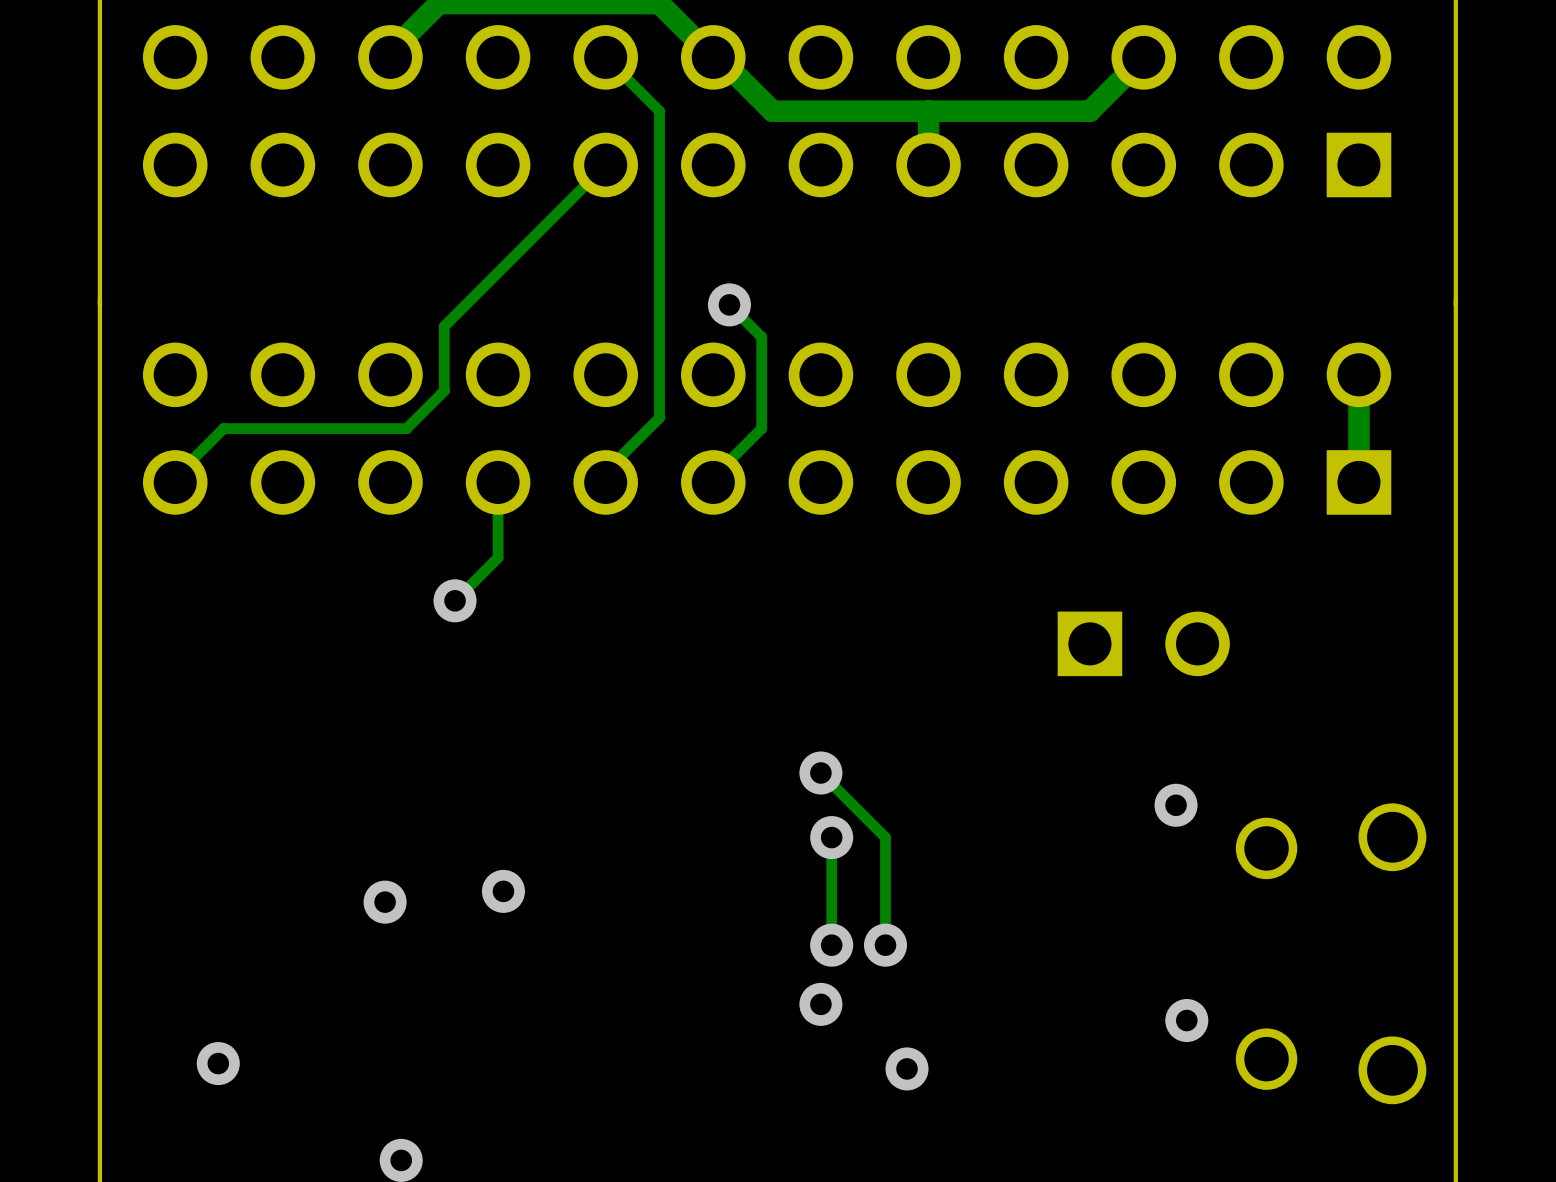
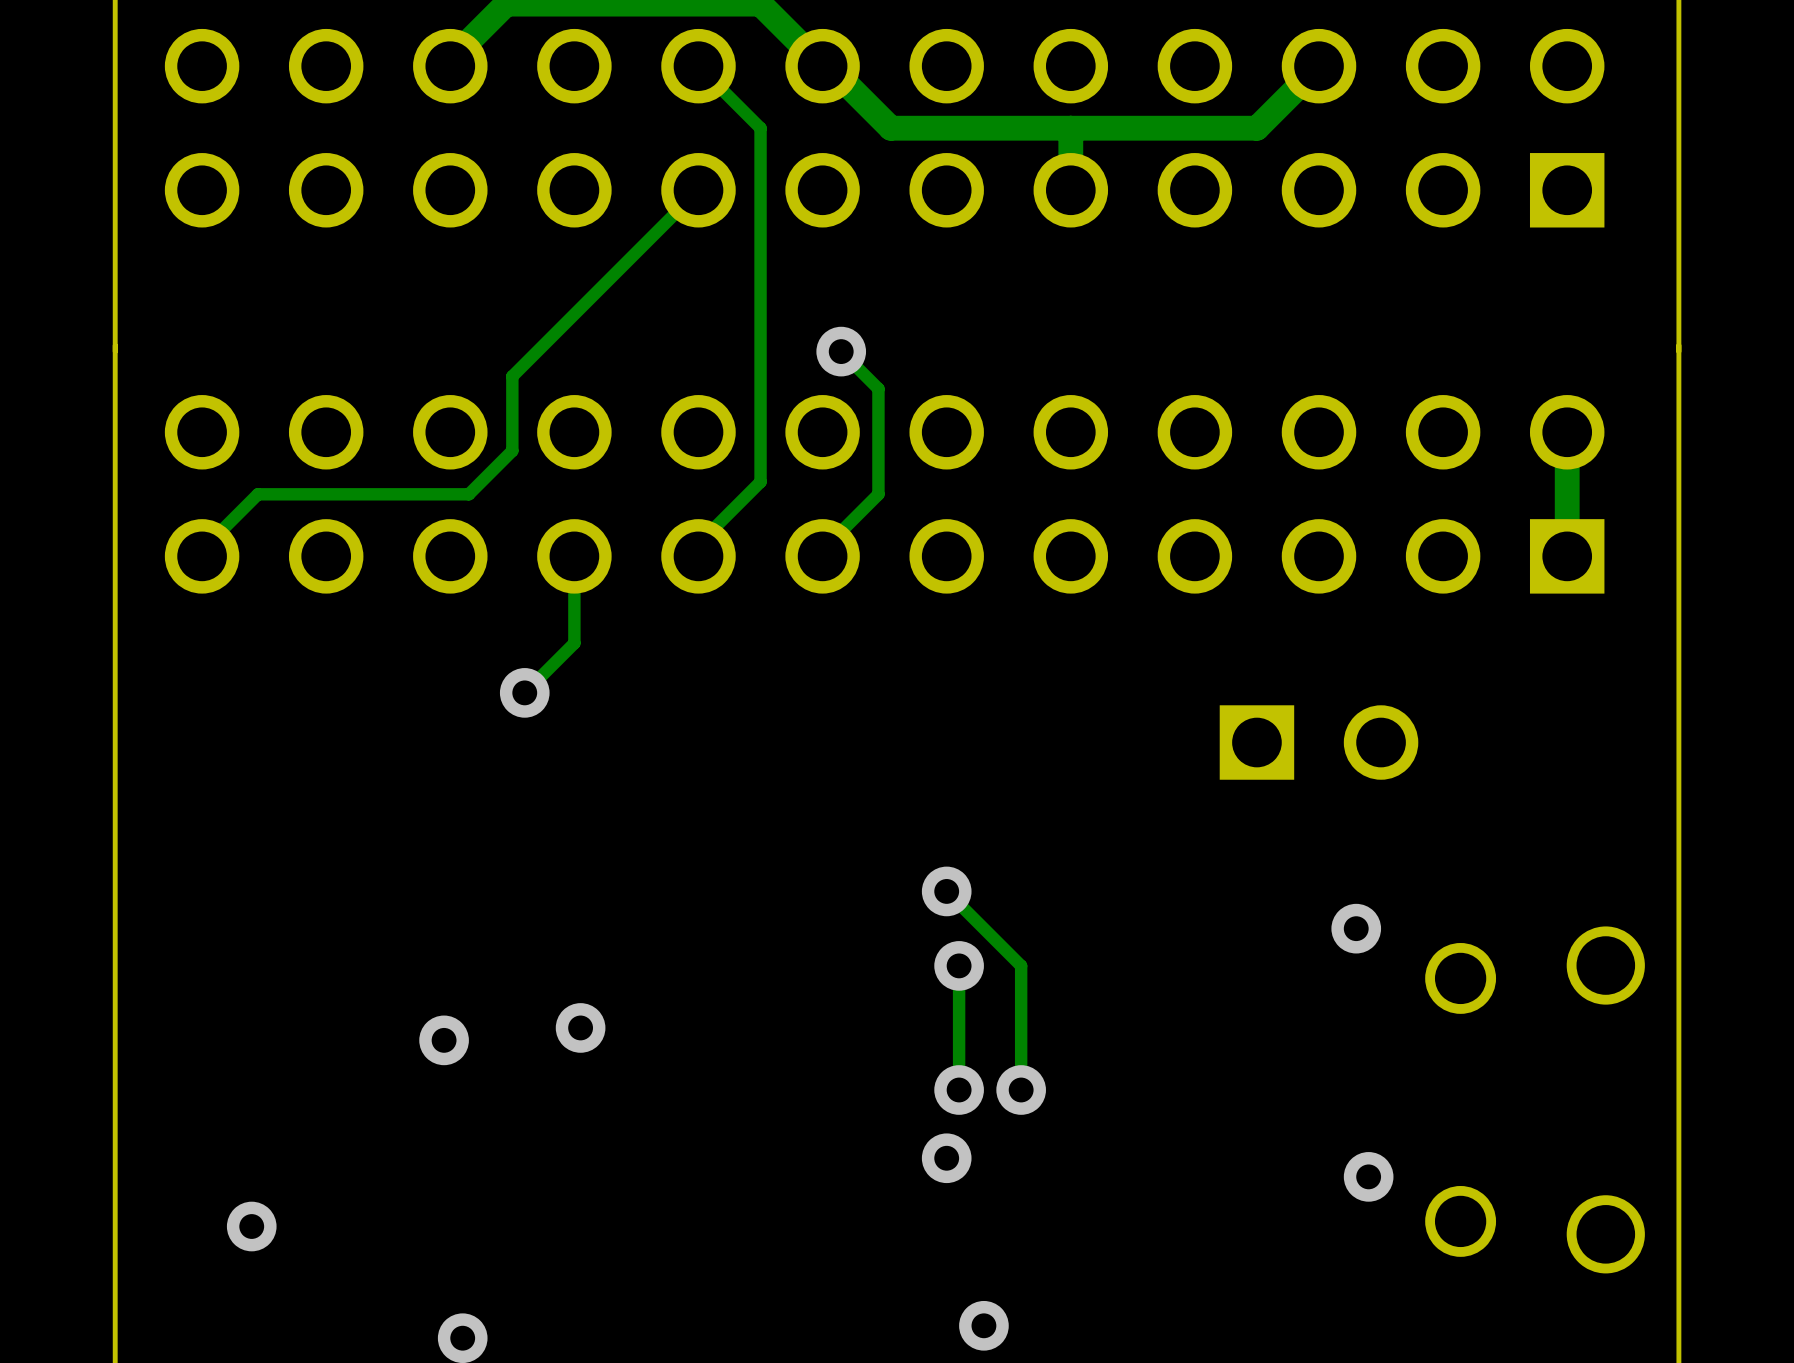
via position: (907, 1068) -> (983, 1325)

